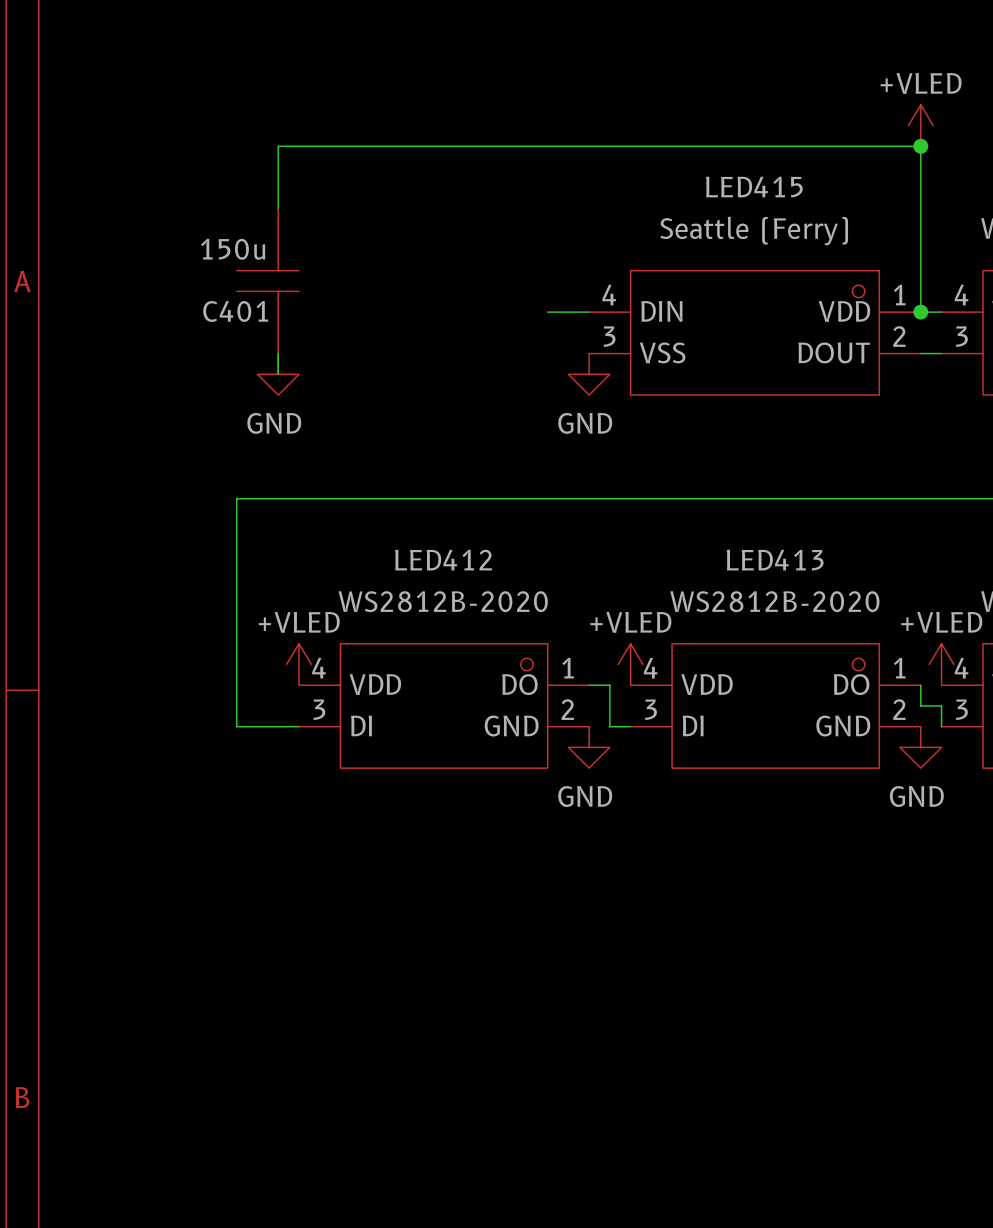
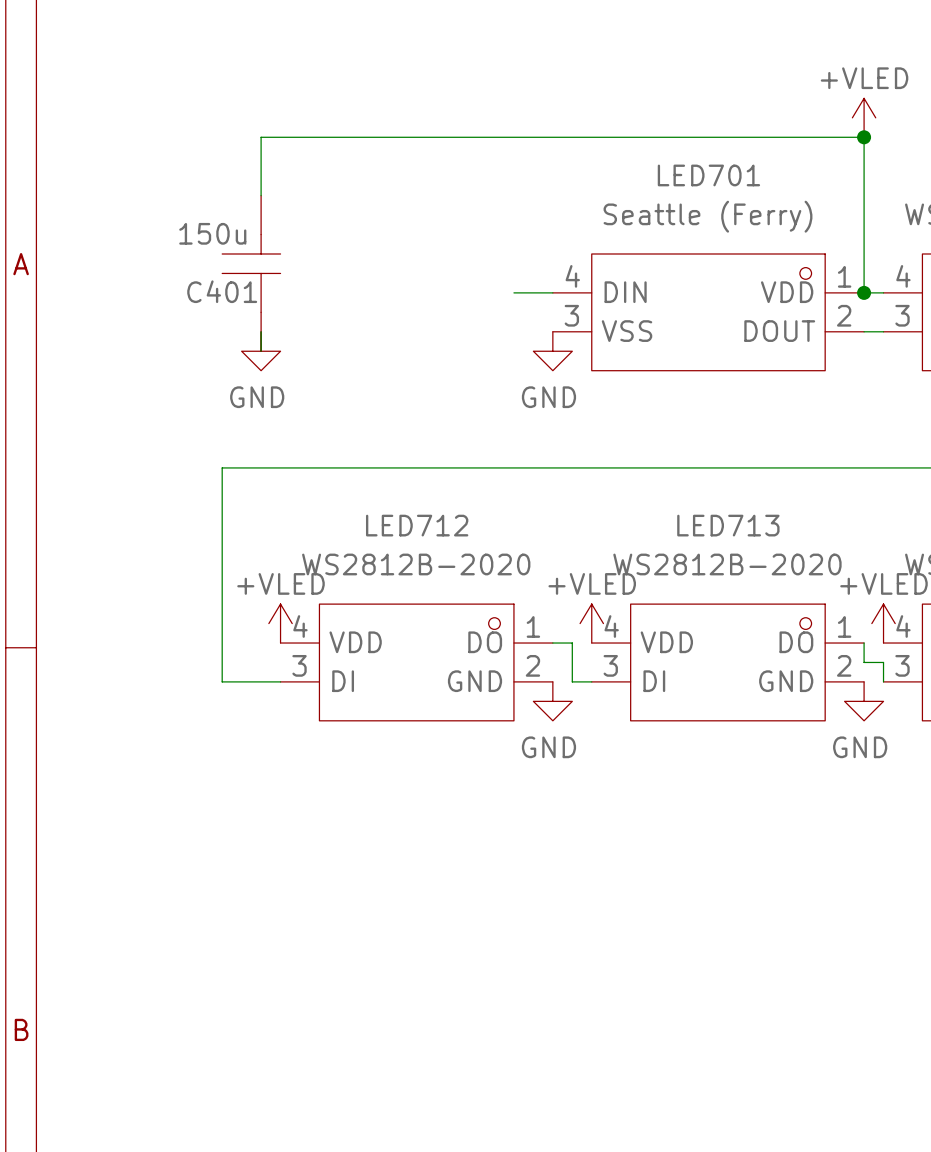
LED415 name: LED415 (754, 186) -> LED701 (708, 175)
LED412 name: LED412 (443, 560) -> LED712 (417, 525)
LED413 name: LED413 (775, 560) -> LED713 (728, 525)

